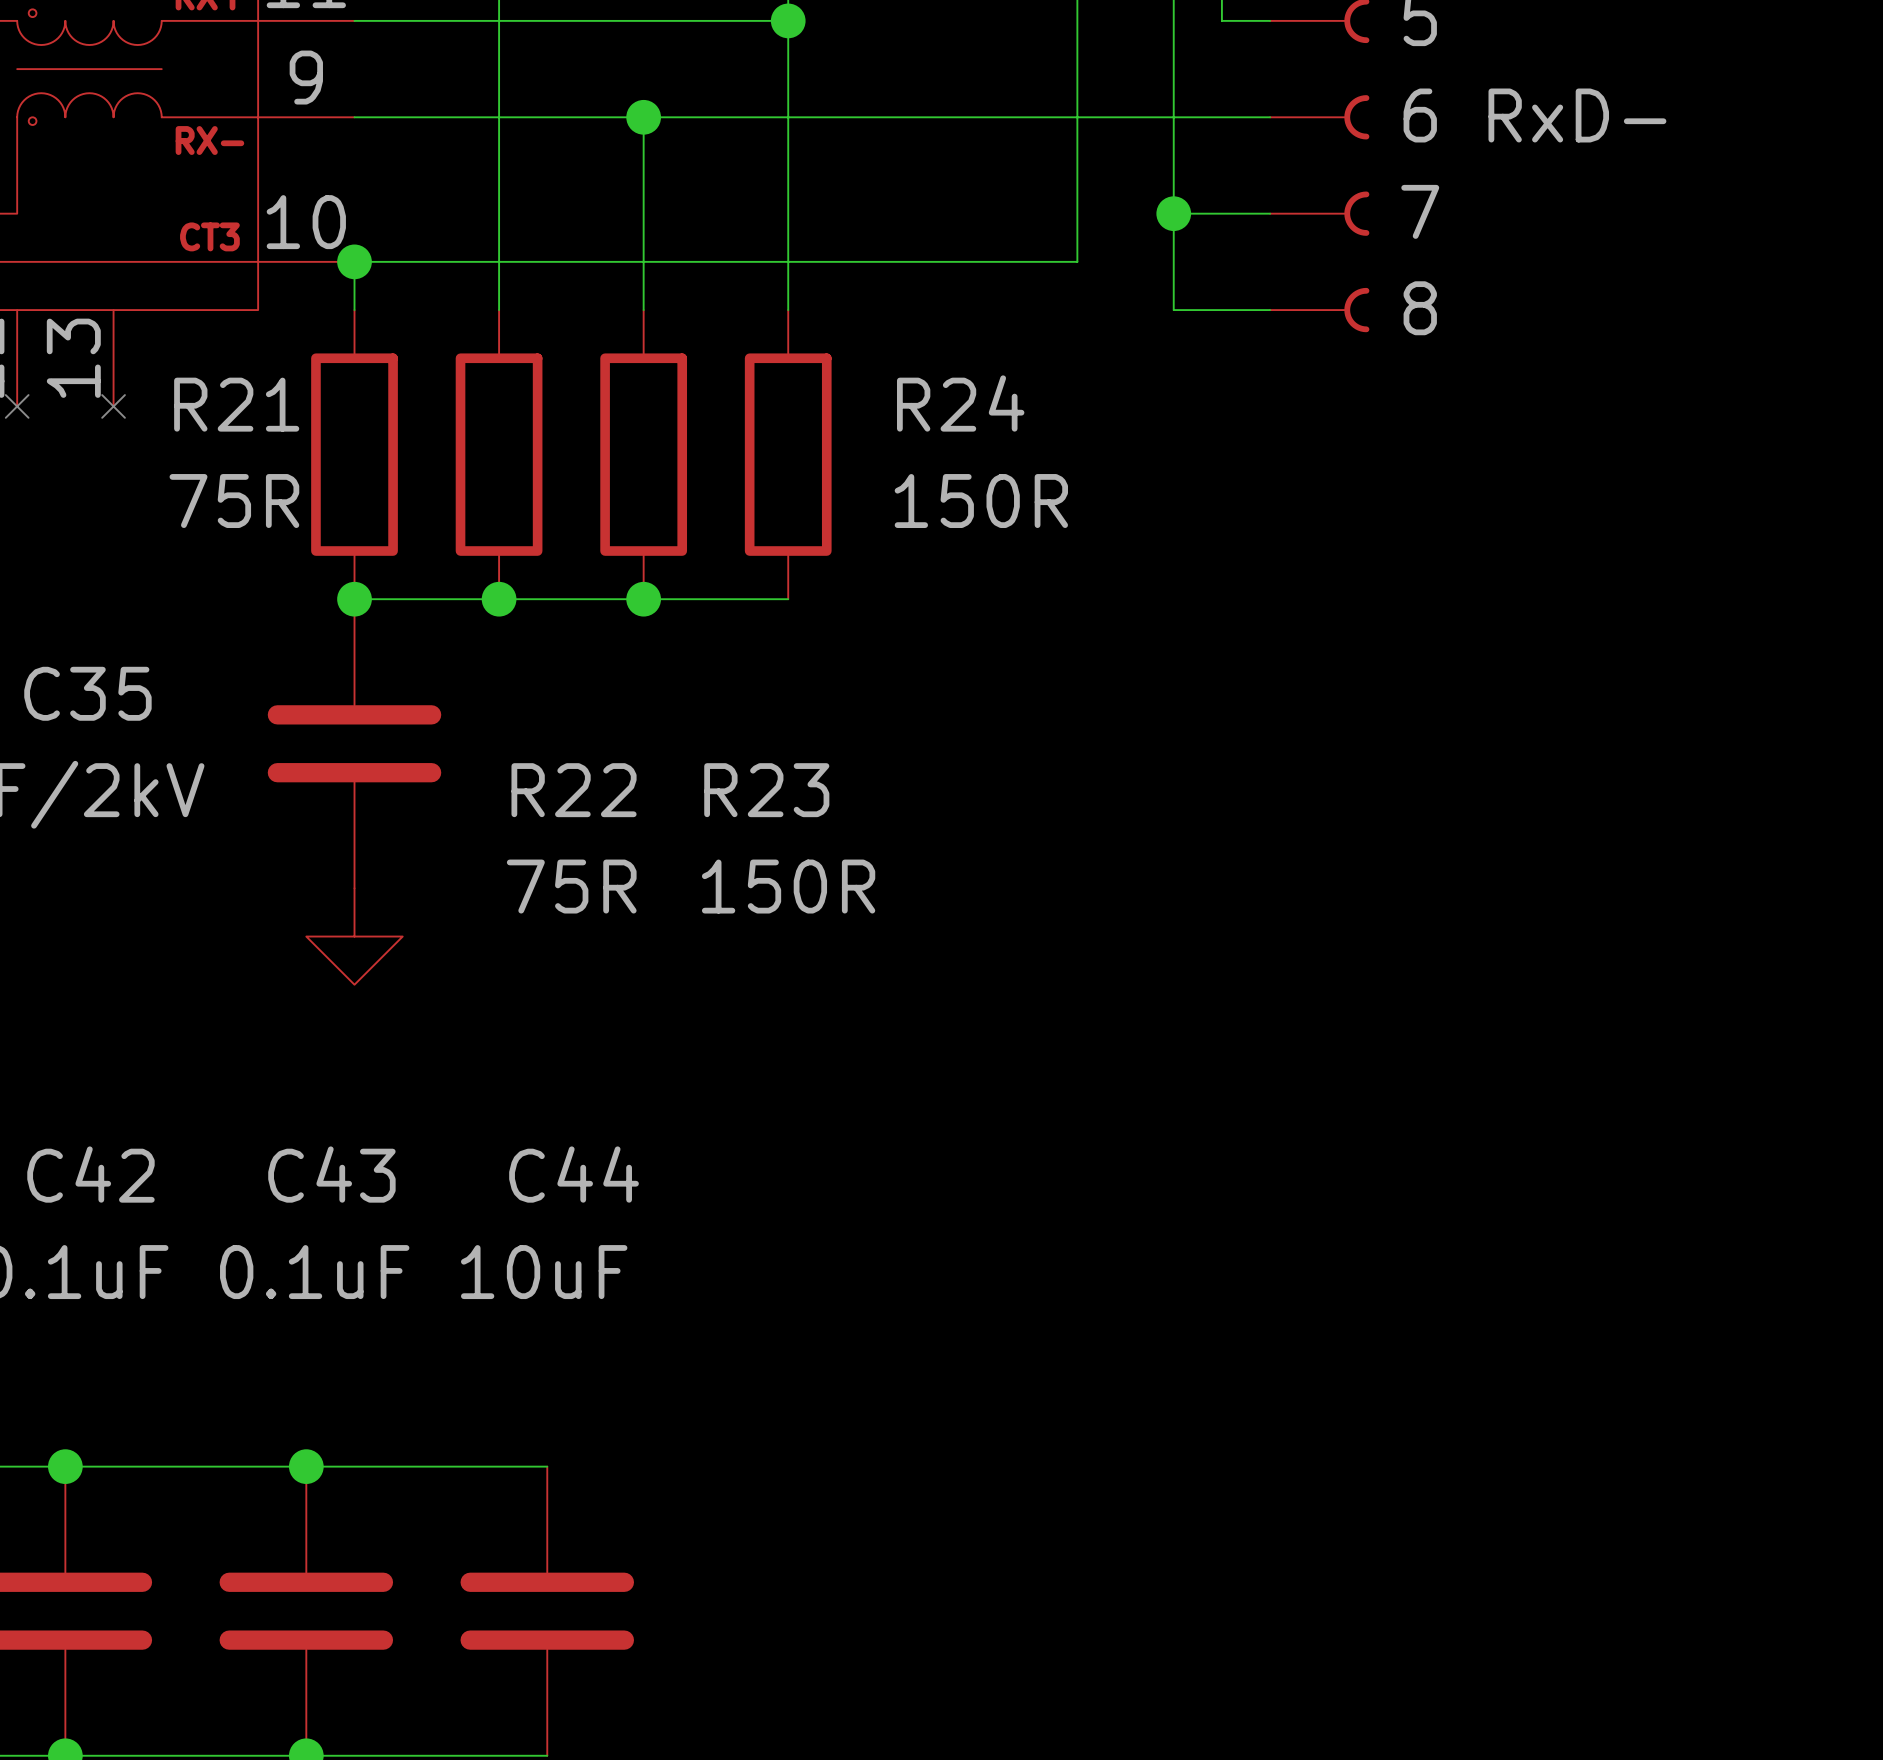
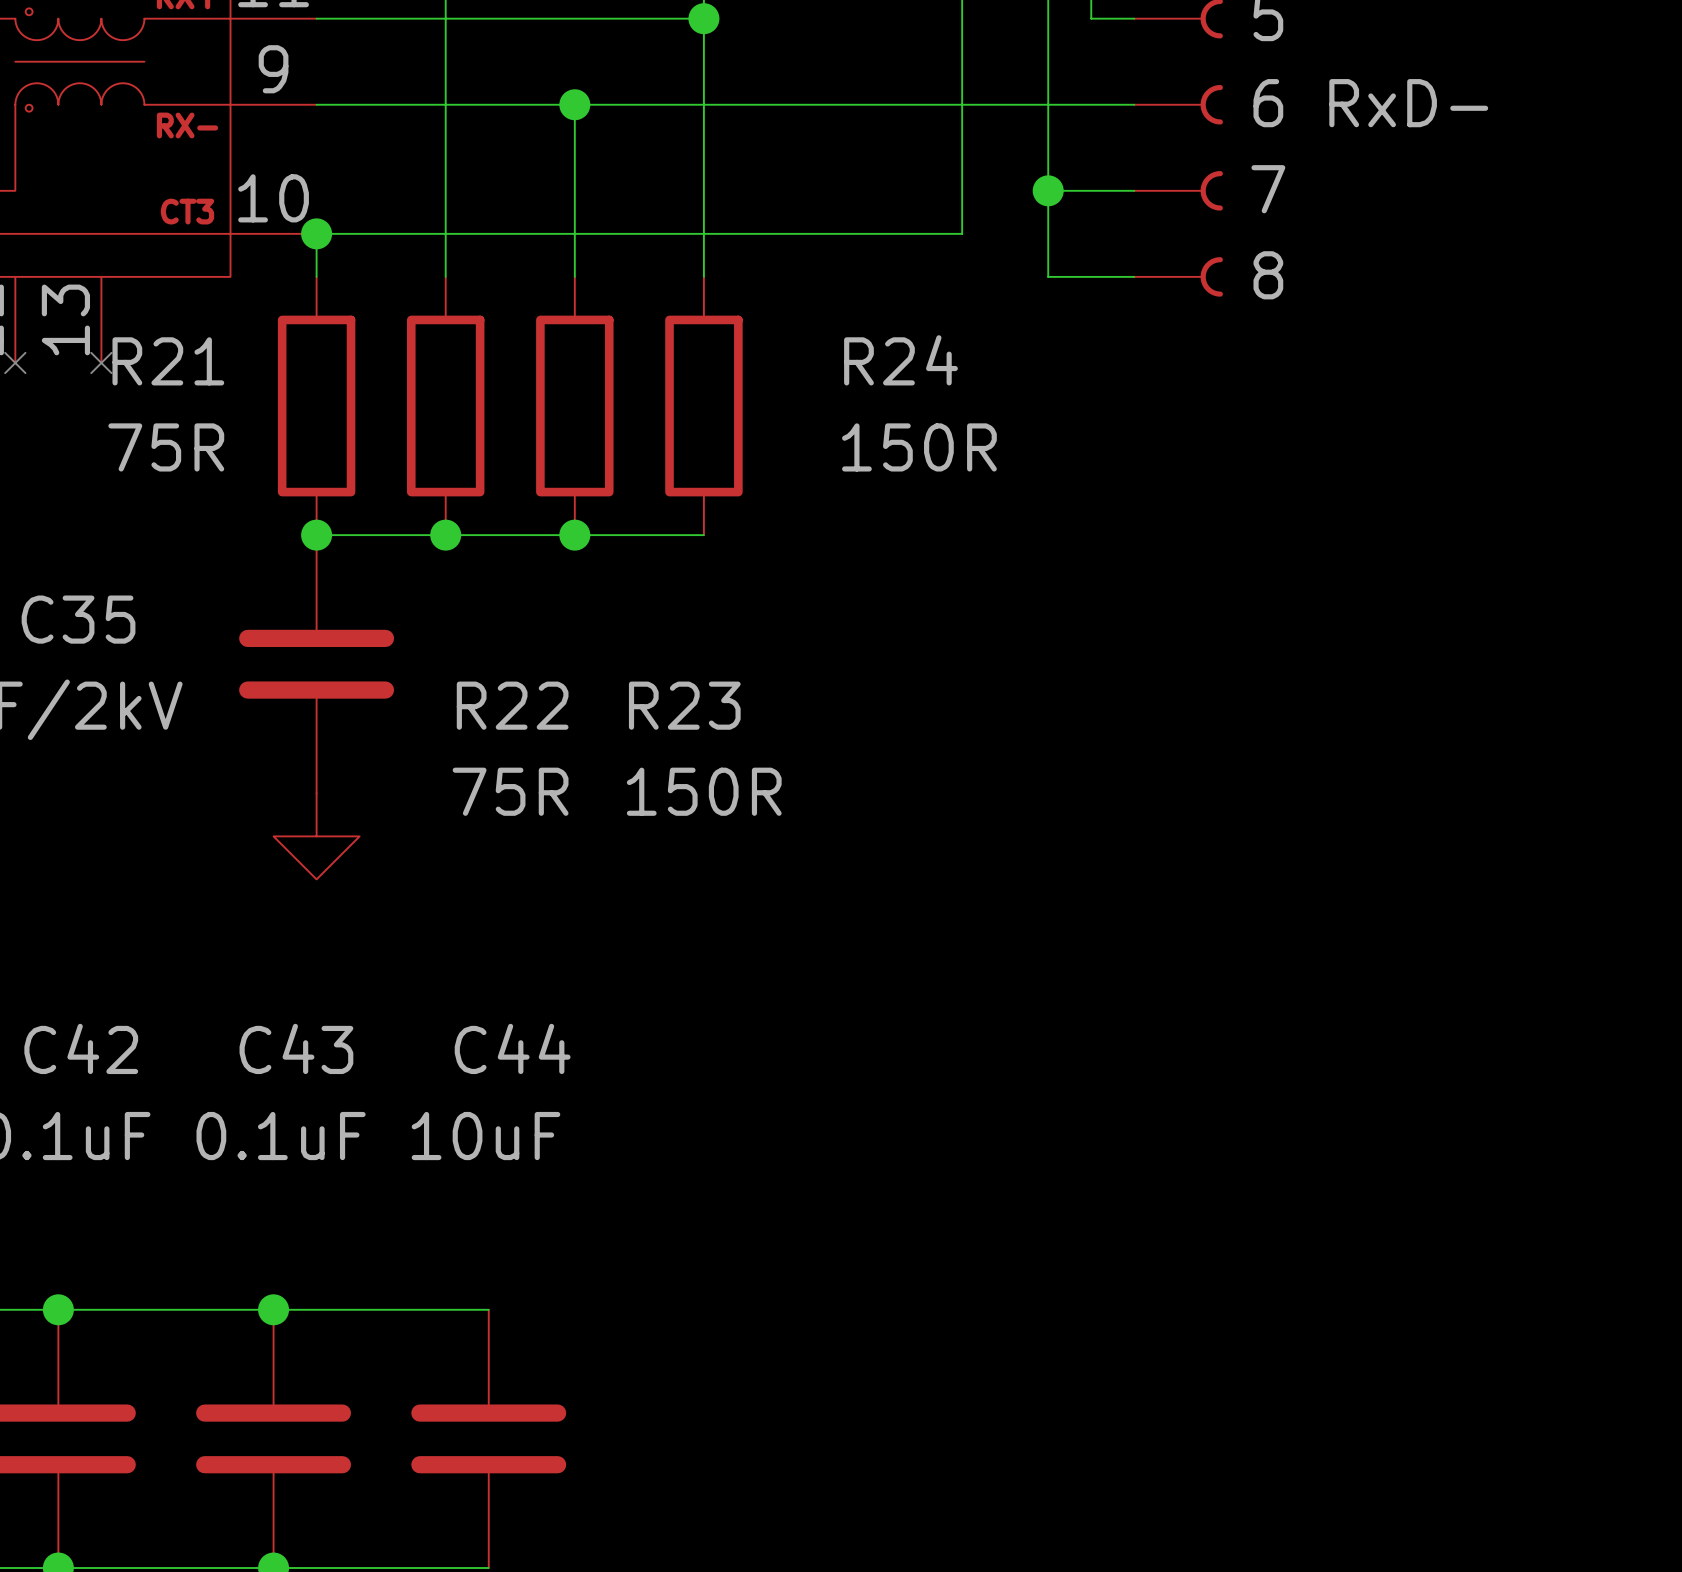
R24 name position: R24 (960, 403) -> R24 (900, 360)
R21 name position: R21 (236, 404) -> R21 (168, 361)
R21 value position: 75R (234, 501) -> 75R (166, 447)
R24 value position: 150R (981, 501) -> 150R (919, 447)

